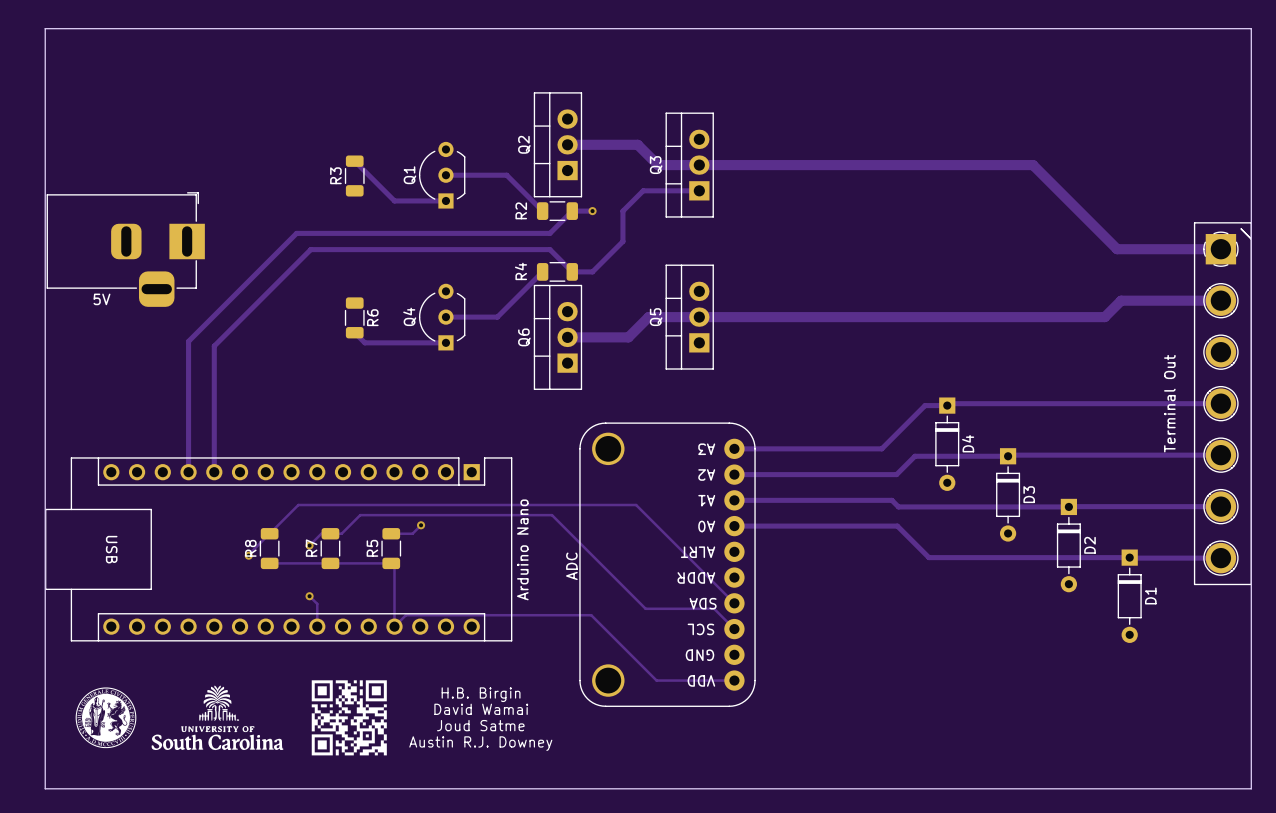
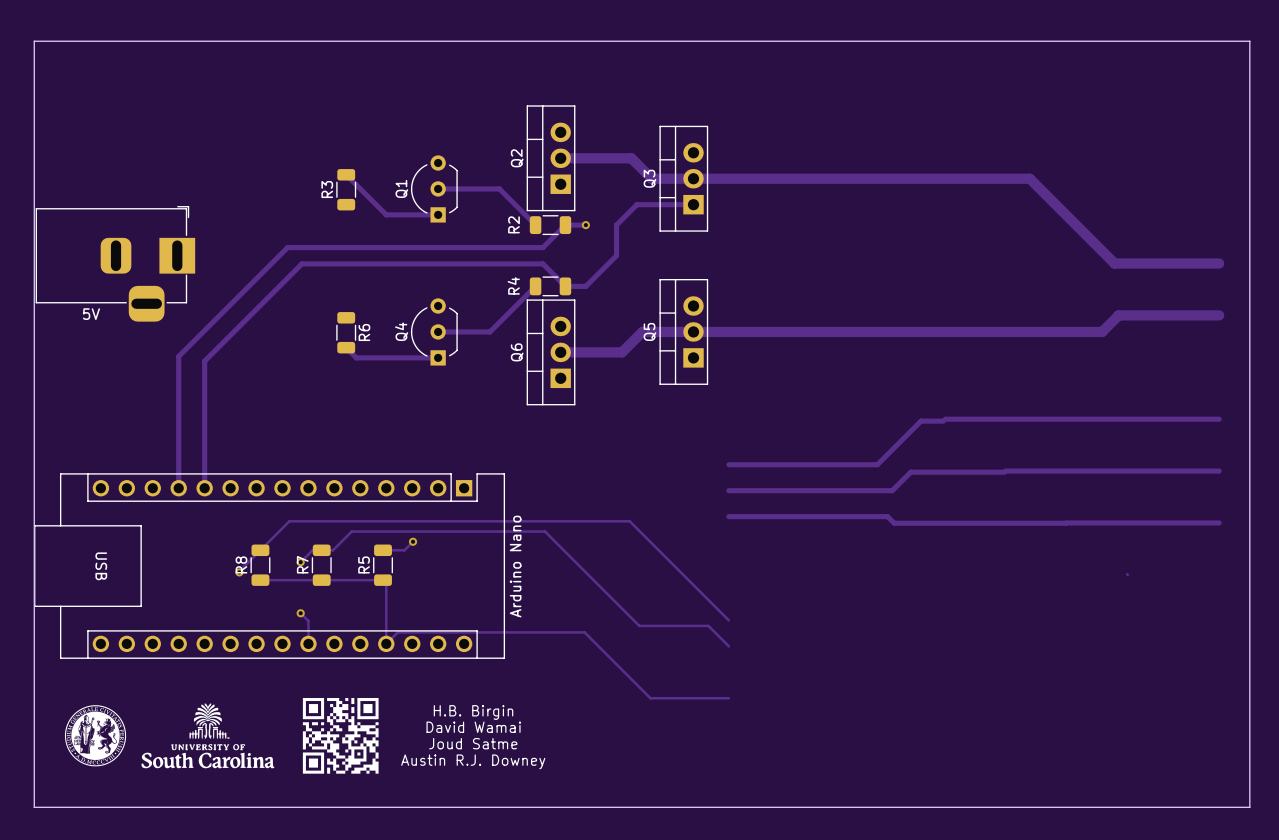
Terminal Out: (1222, 403) -> none
D4: (947, 444) -> none
D3: (1008, 494) -> none
track: (734, 526) (897, 526) (928, 557) (1129, 557) -> none
D2: (1068, 545) -> none
track: (1130, 558) (1220, 558) -> none
ADC: (667, 564) -> none
D1: (1129, 596) -> none

